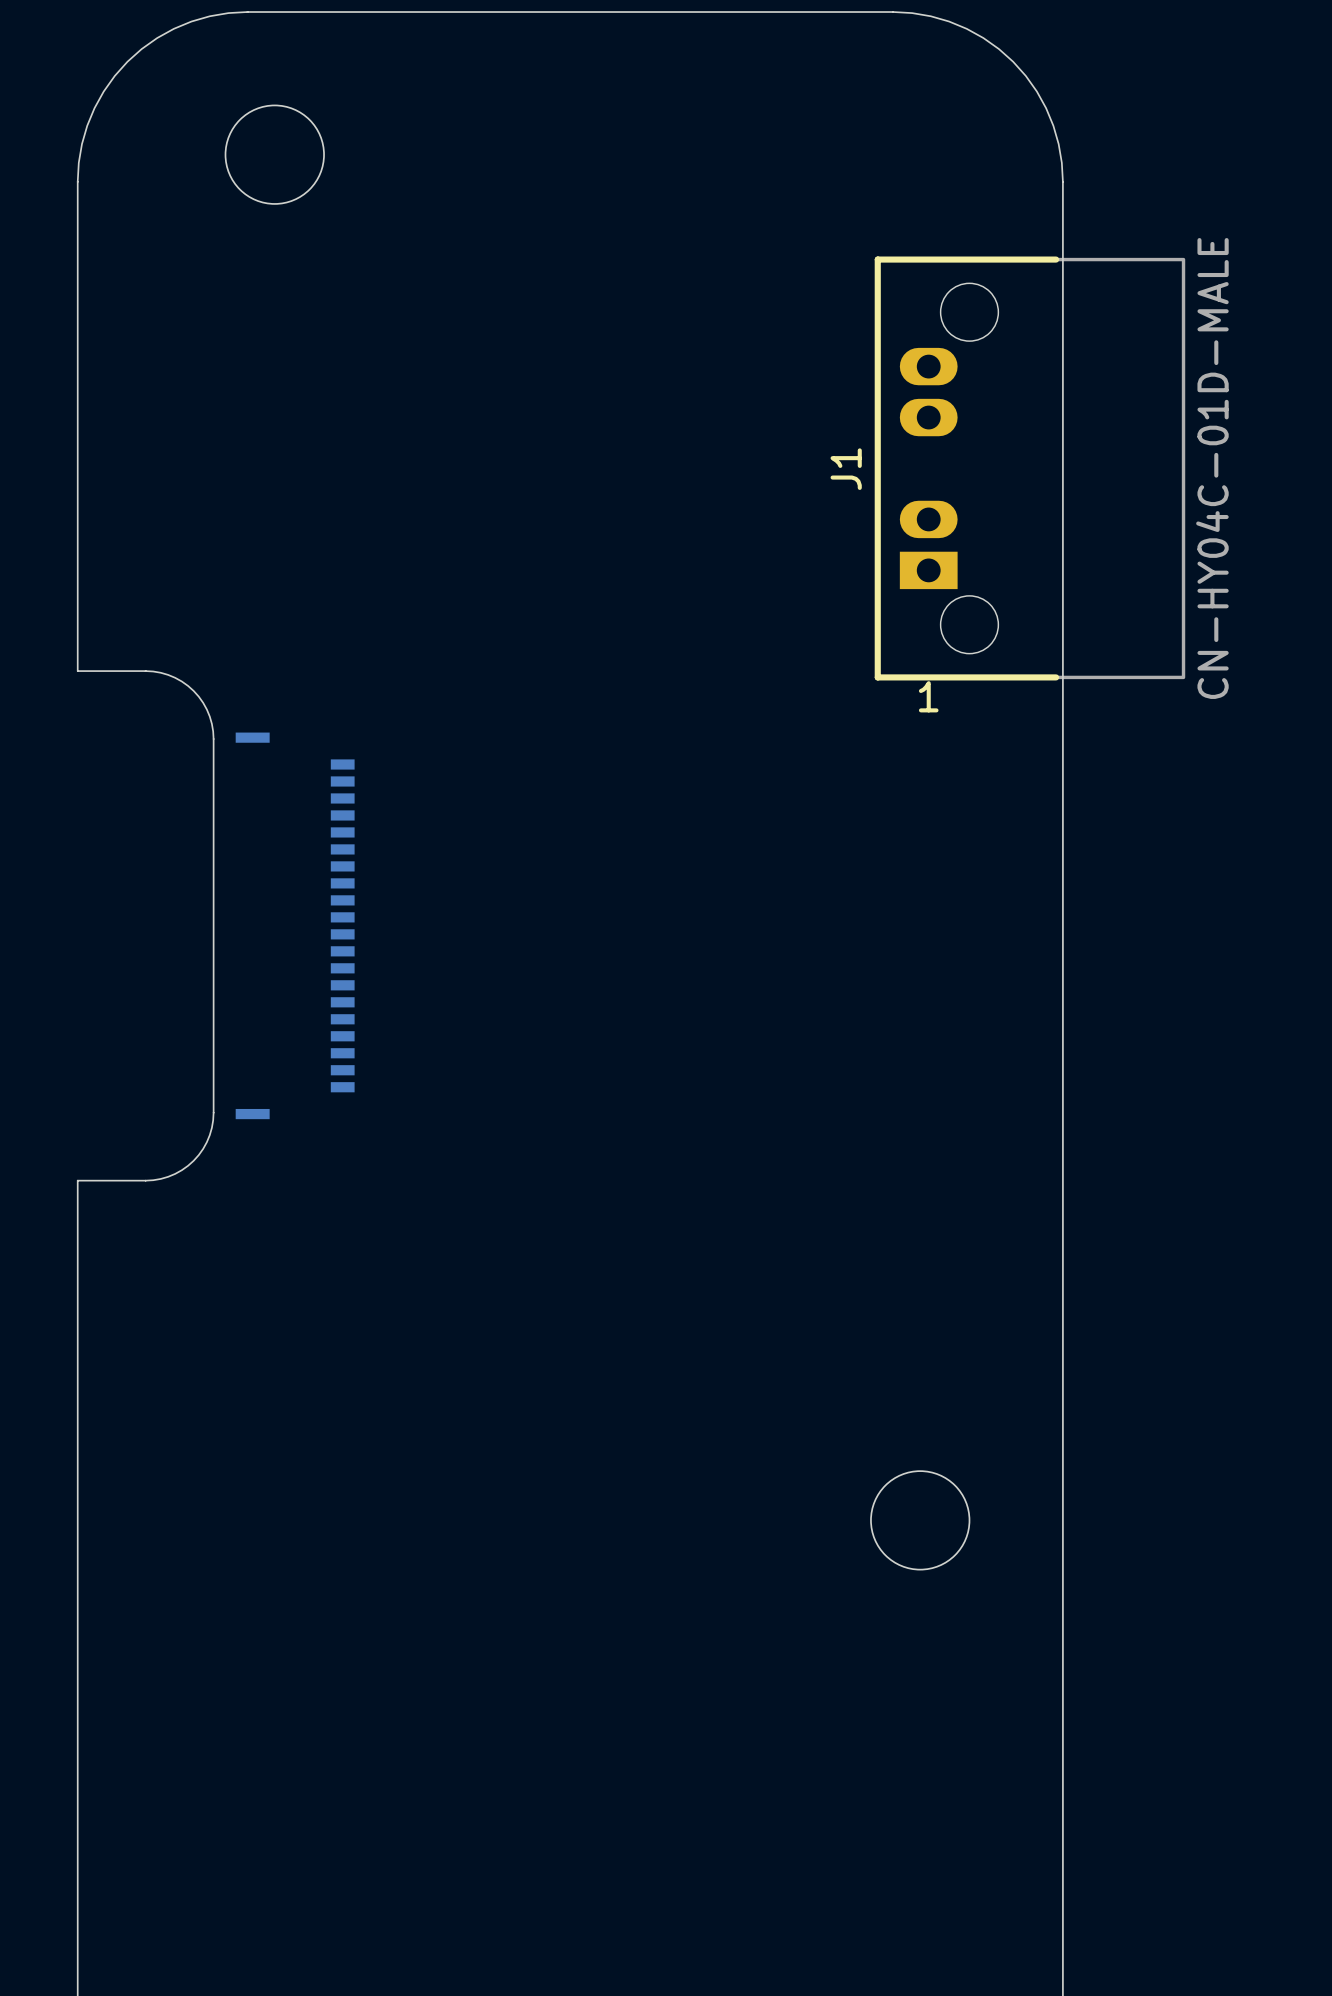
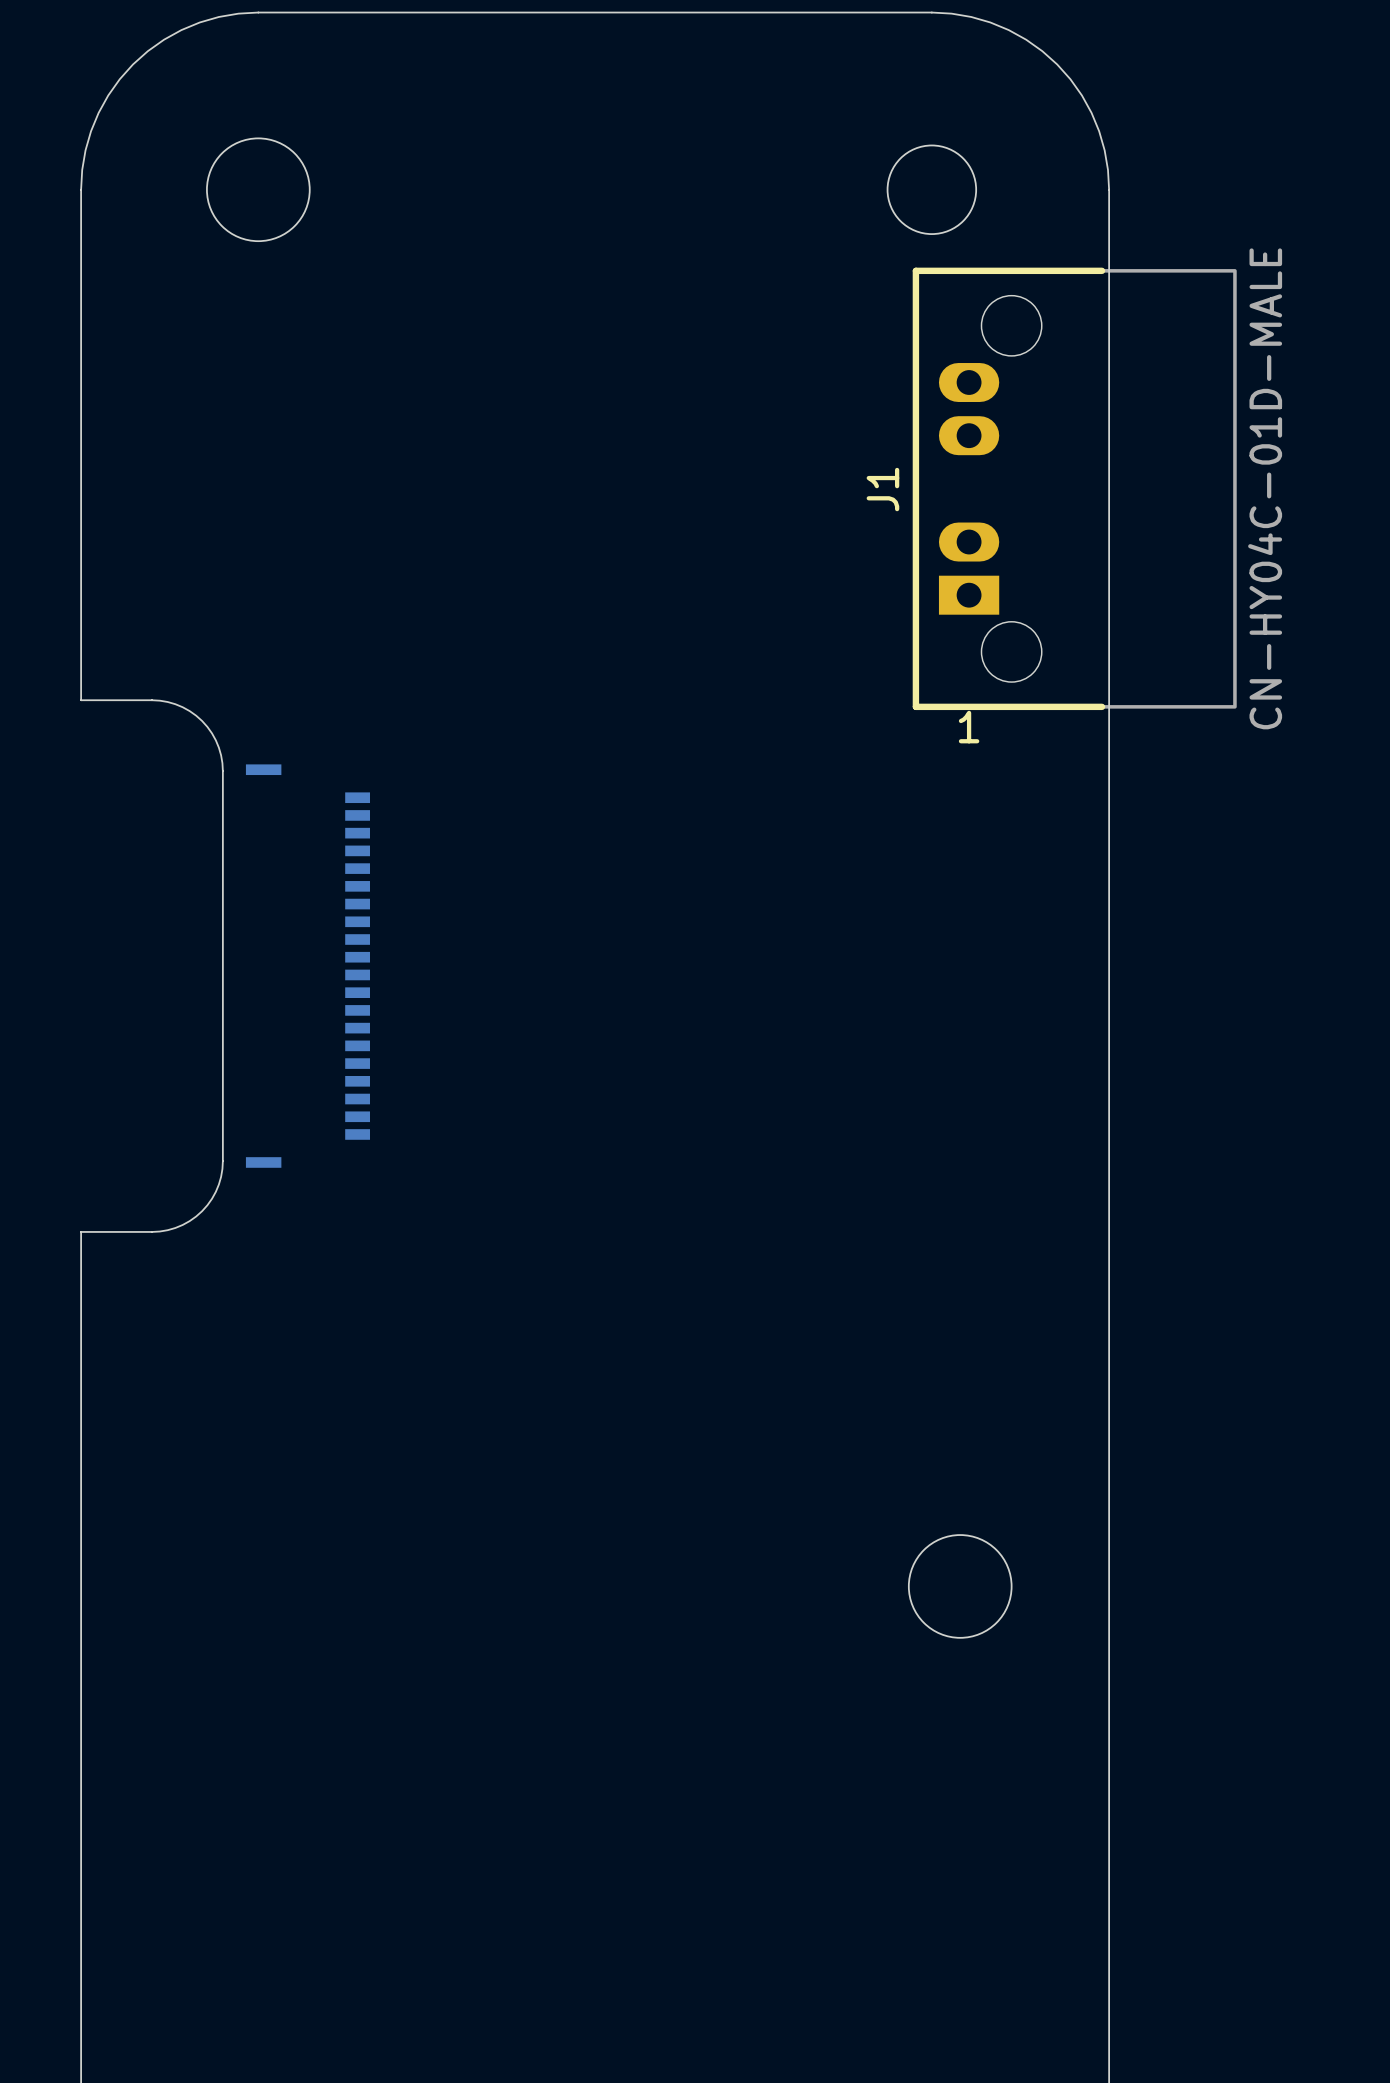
round board edge: none -> [886, 144, 978, 235]
round board edge position: (274, 154) -> (258, 189)

